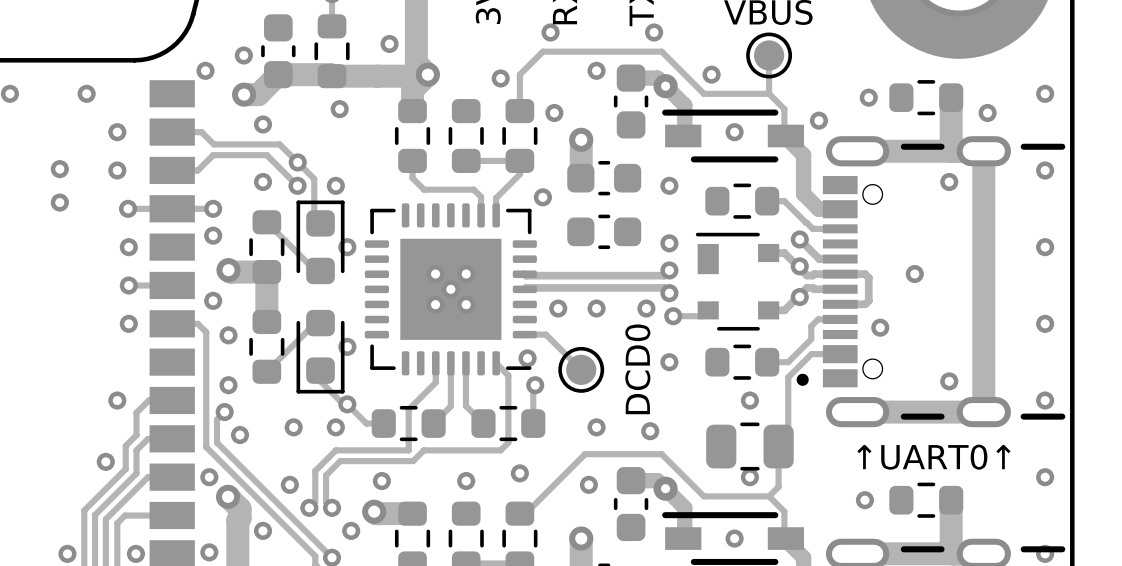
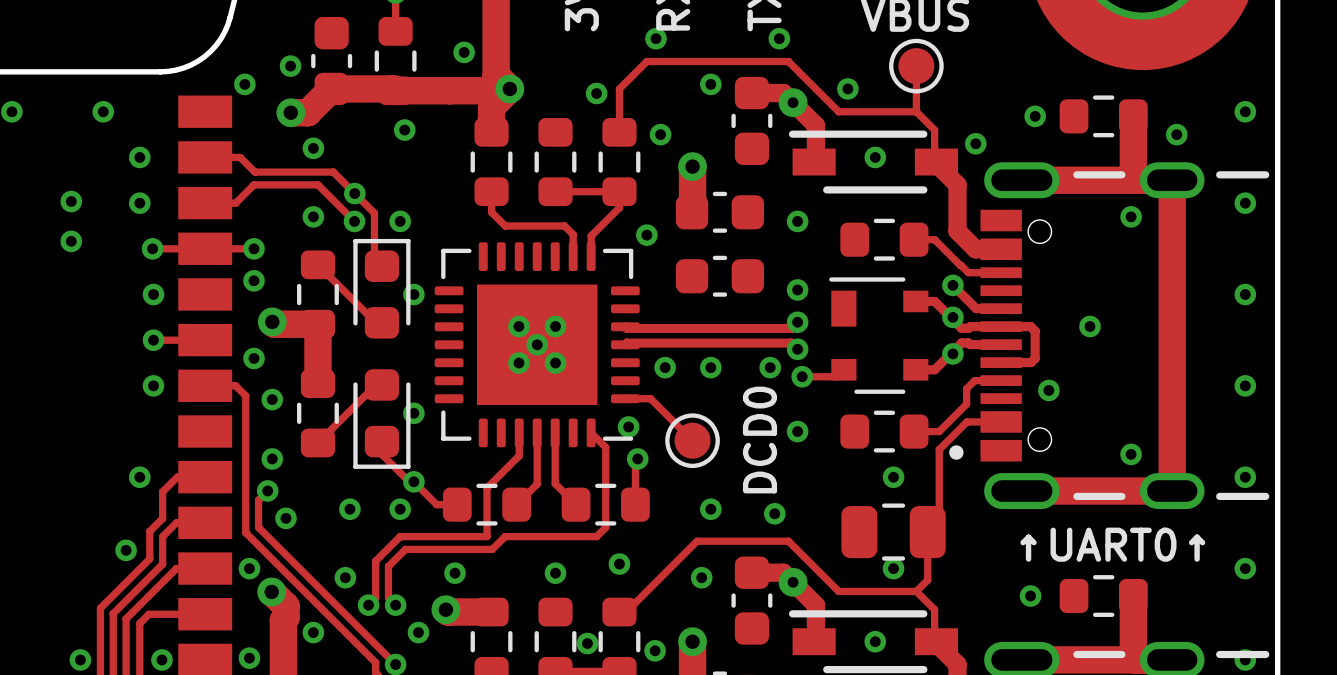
via: none -> (587, 643)
via: none -> (655, 650)

